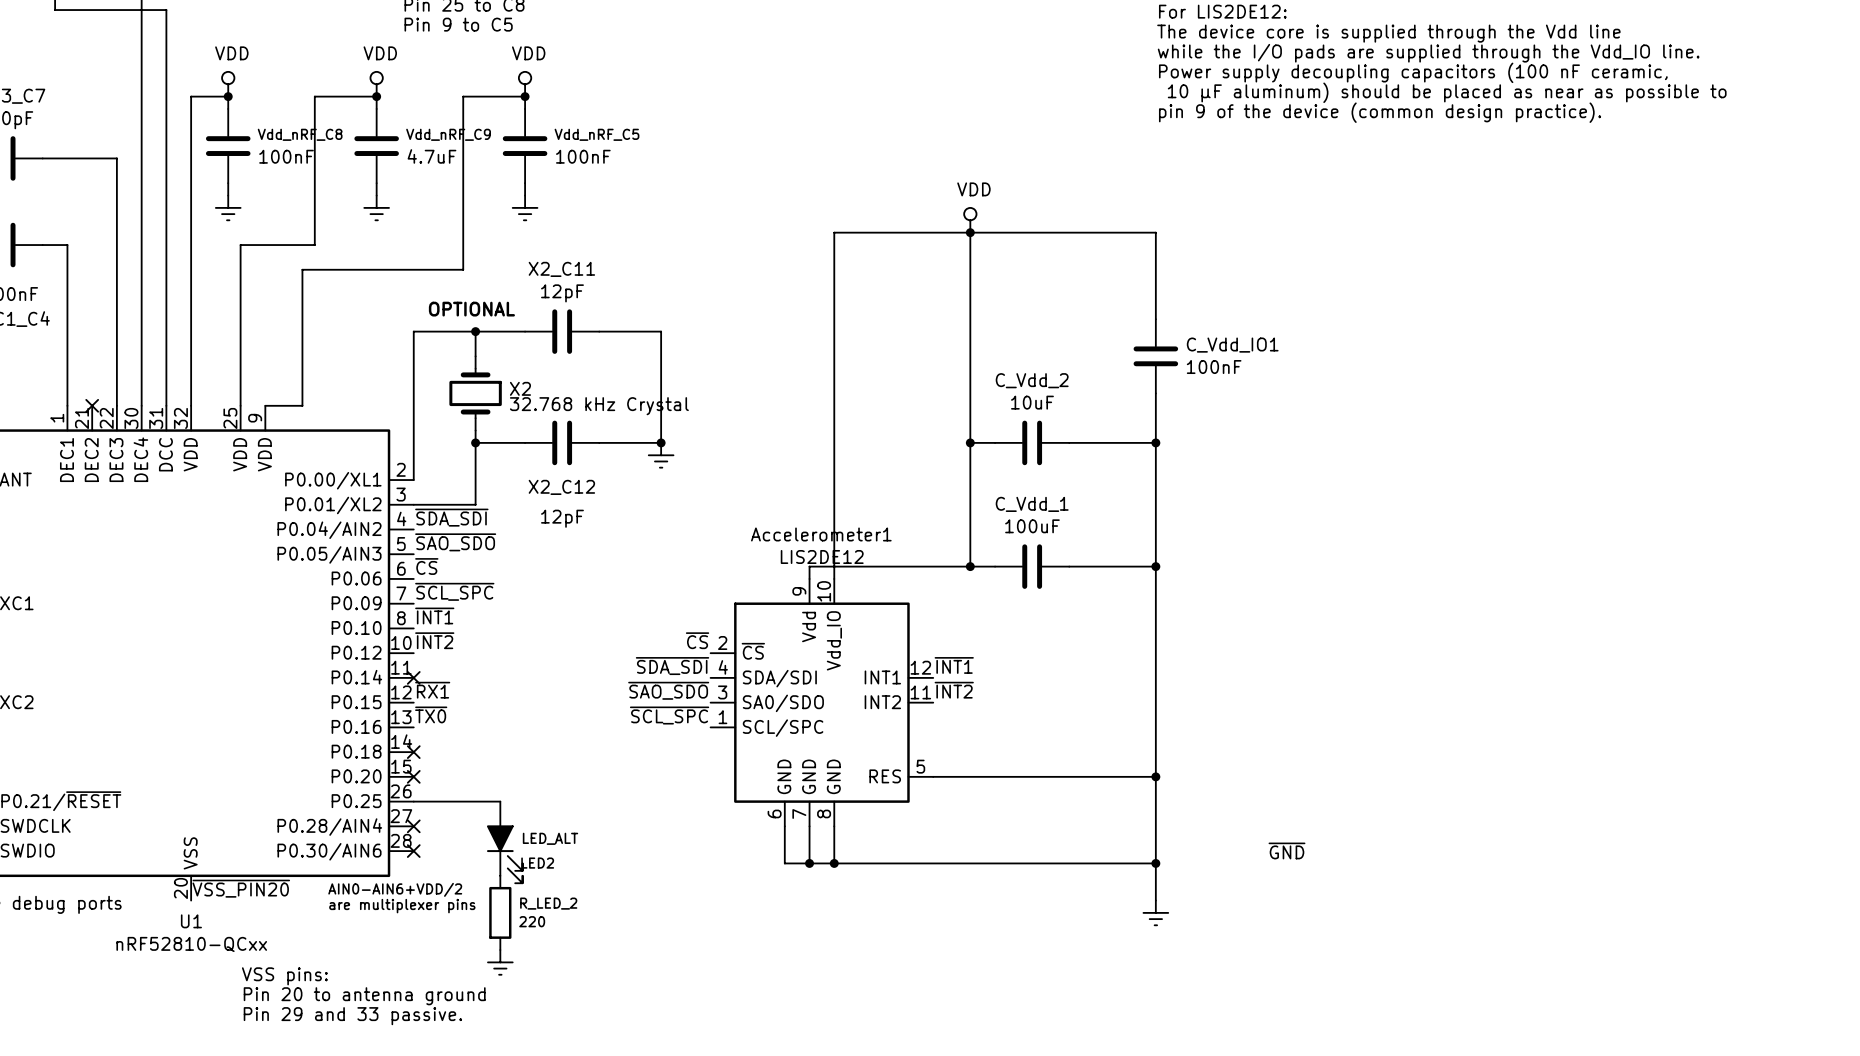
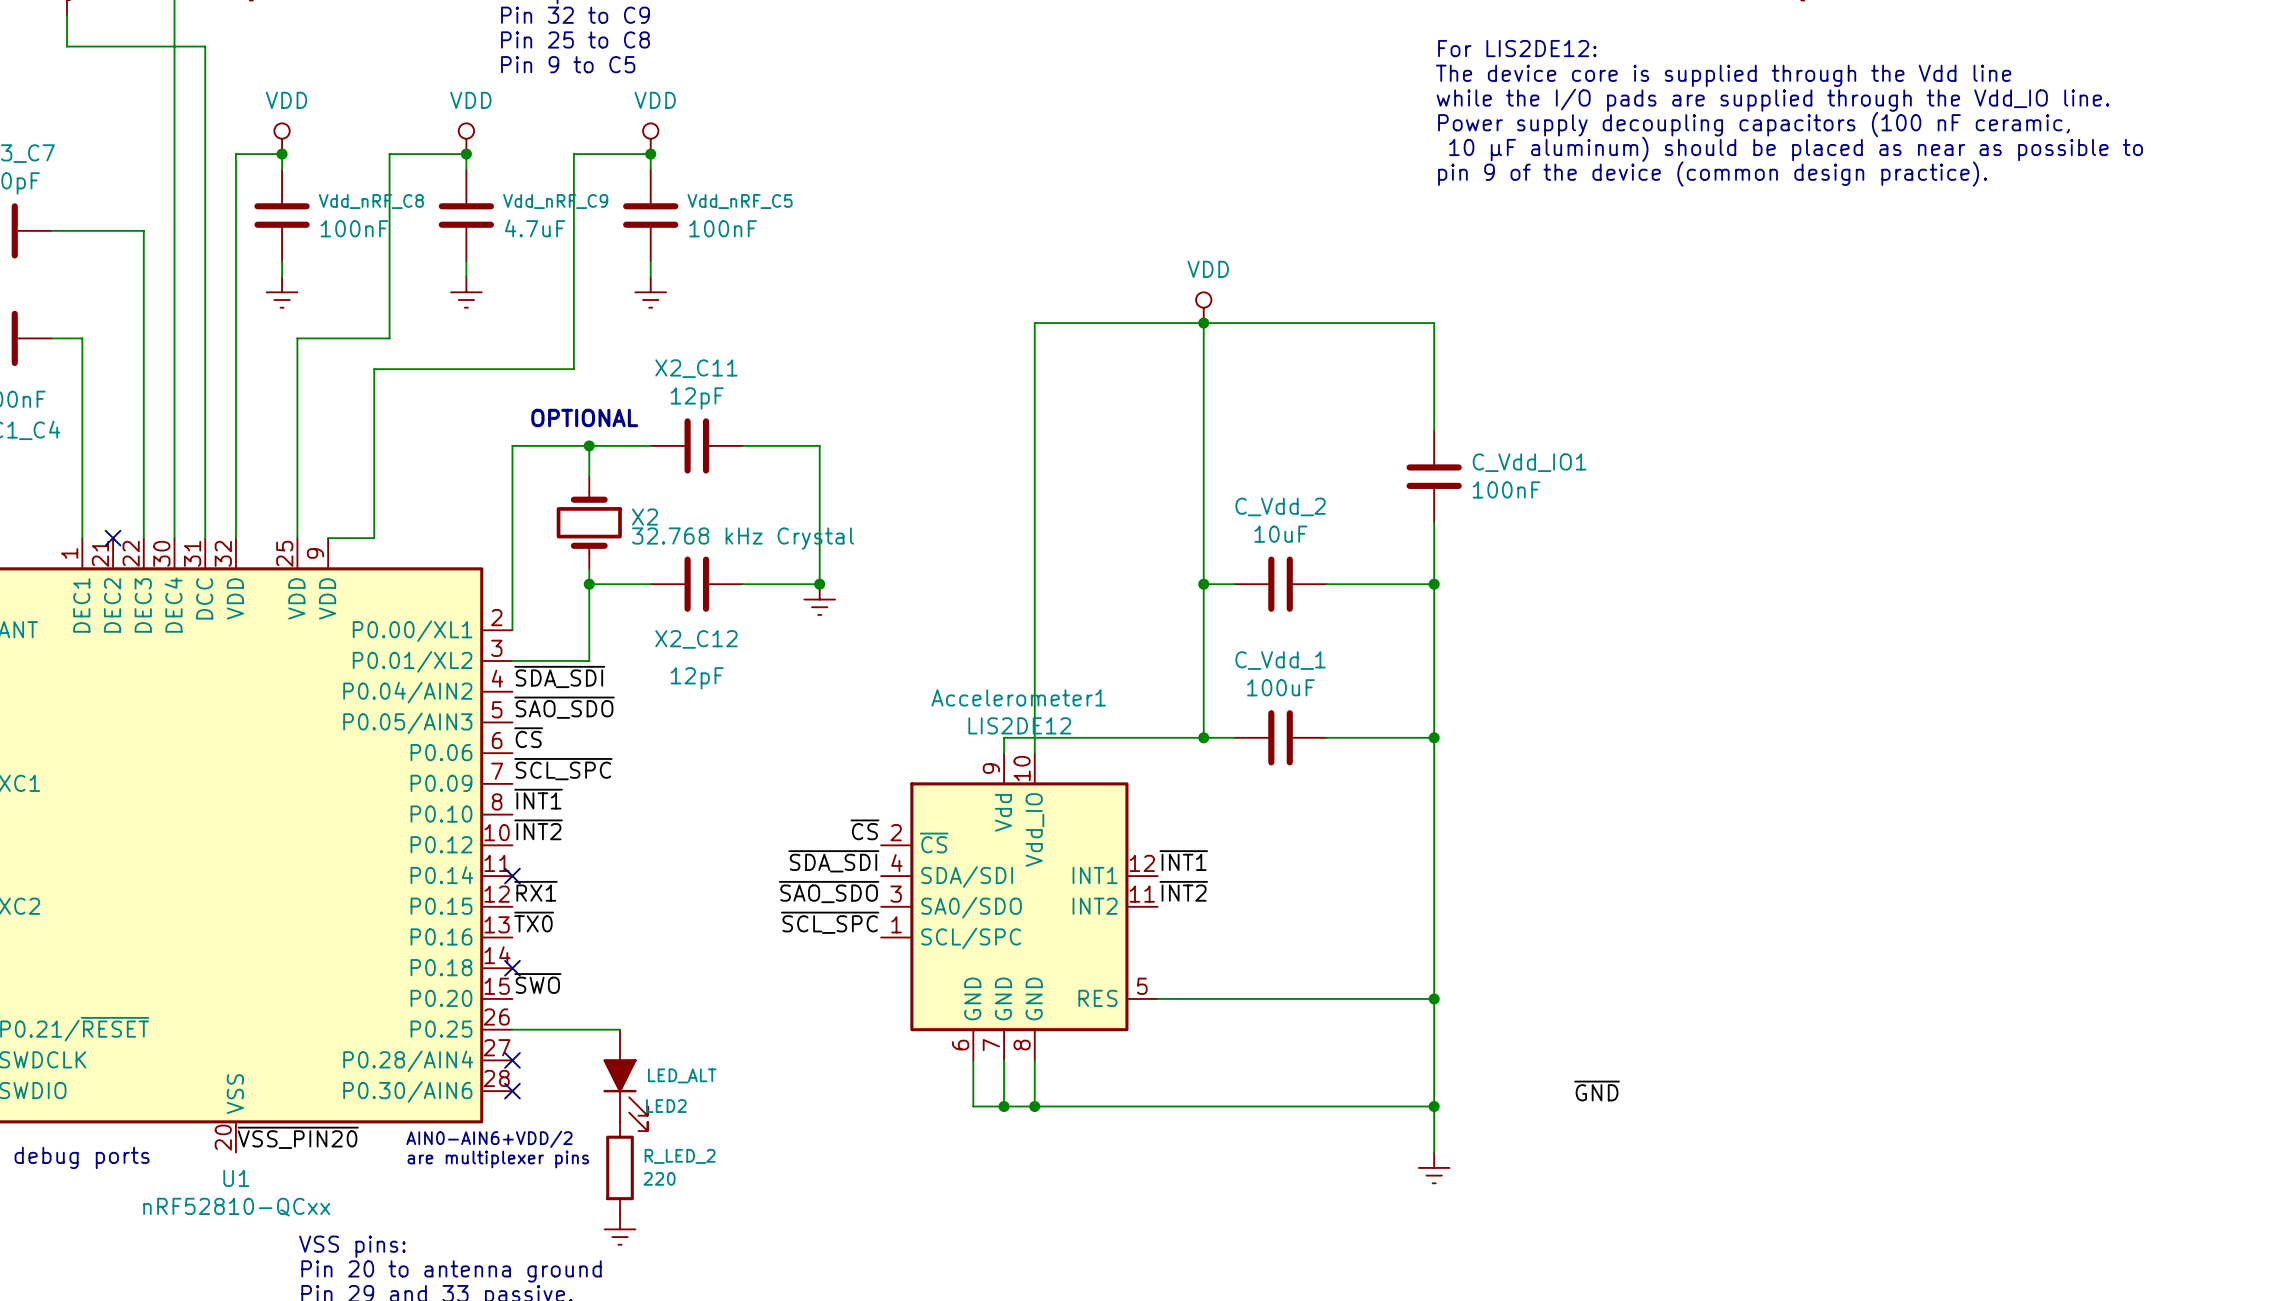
label: none -> ~{SWO} (537, 983)
no-connect mark: (413, 776) -> none

